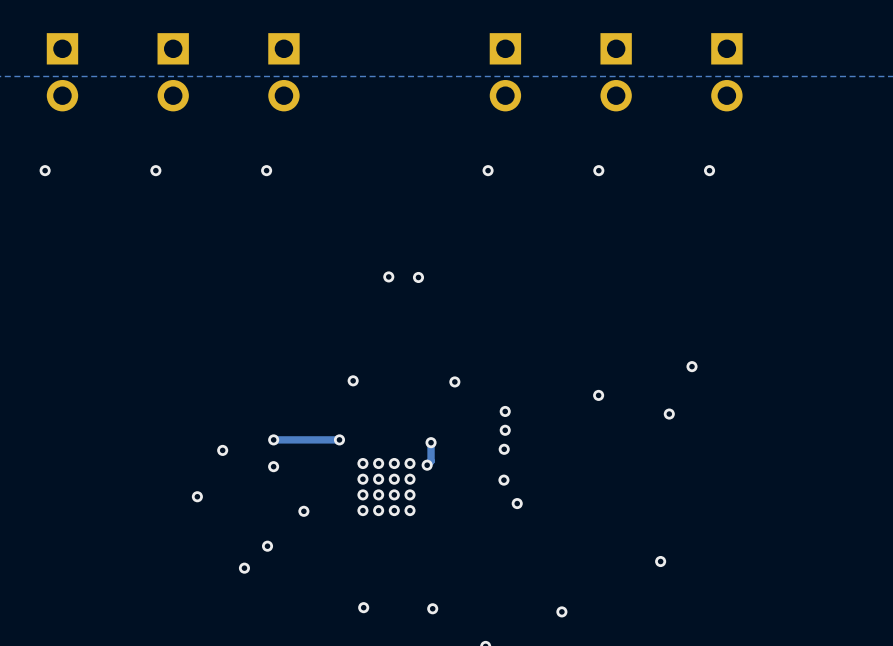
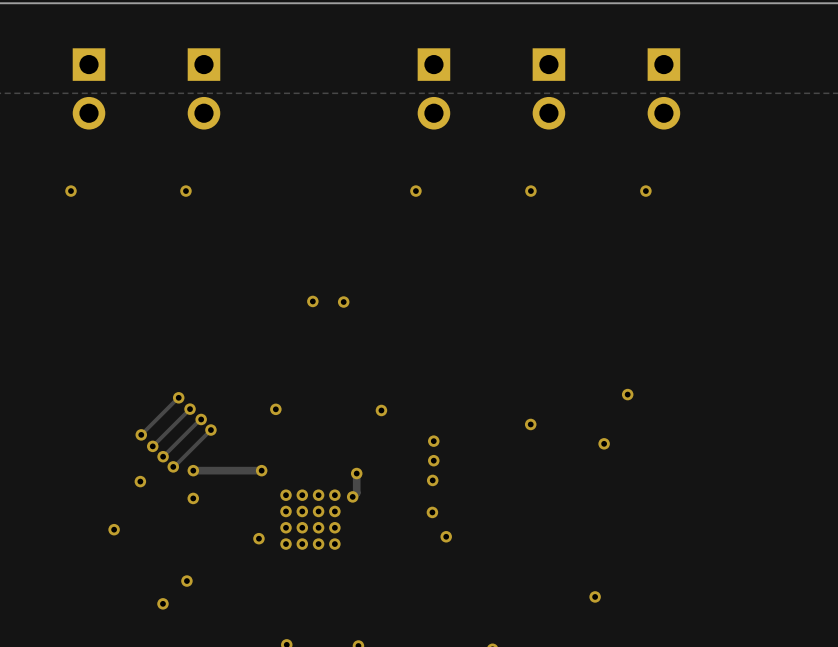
track: none -> (178, 397) (141, 434)
via: none -> (178, 397)
track: none -> (190, 409) (152, 446)
via: none -> (190, 409)
track: none -> (201, 419) (163, 456)
via: none -> (201, 419)
track: none -> (210, 430) (173, 466)
via: none -> (210, 430)
via: none -> (141, 434)
via: none -> (152, 446)
via: none -> (163, 456)
via: none -> (173, 466)
via position: (303, 511) -> (258, 538)

